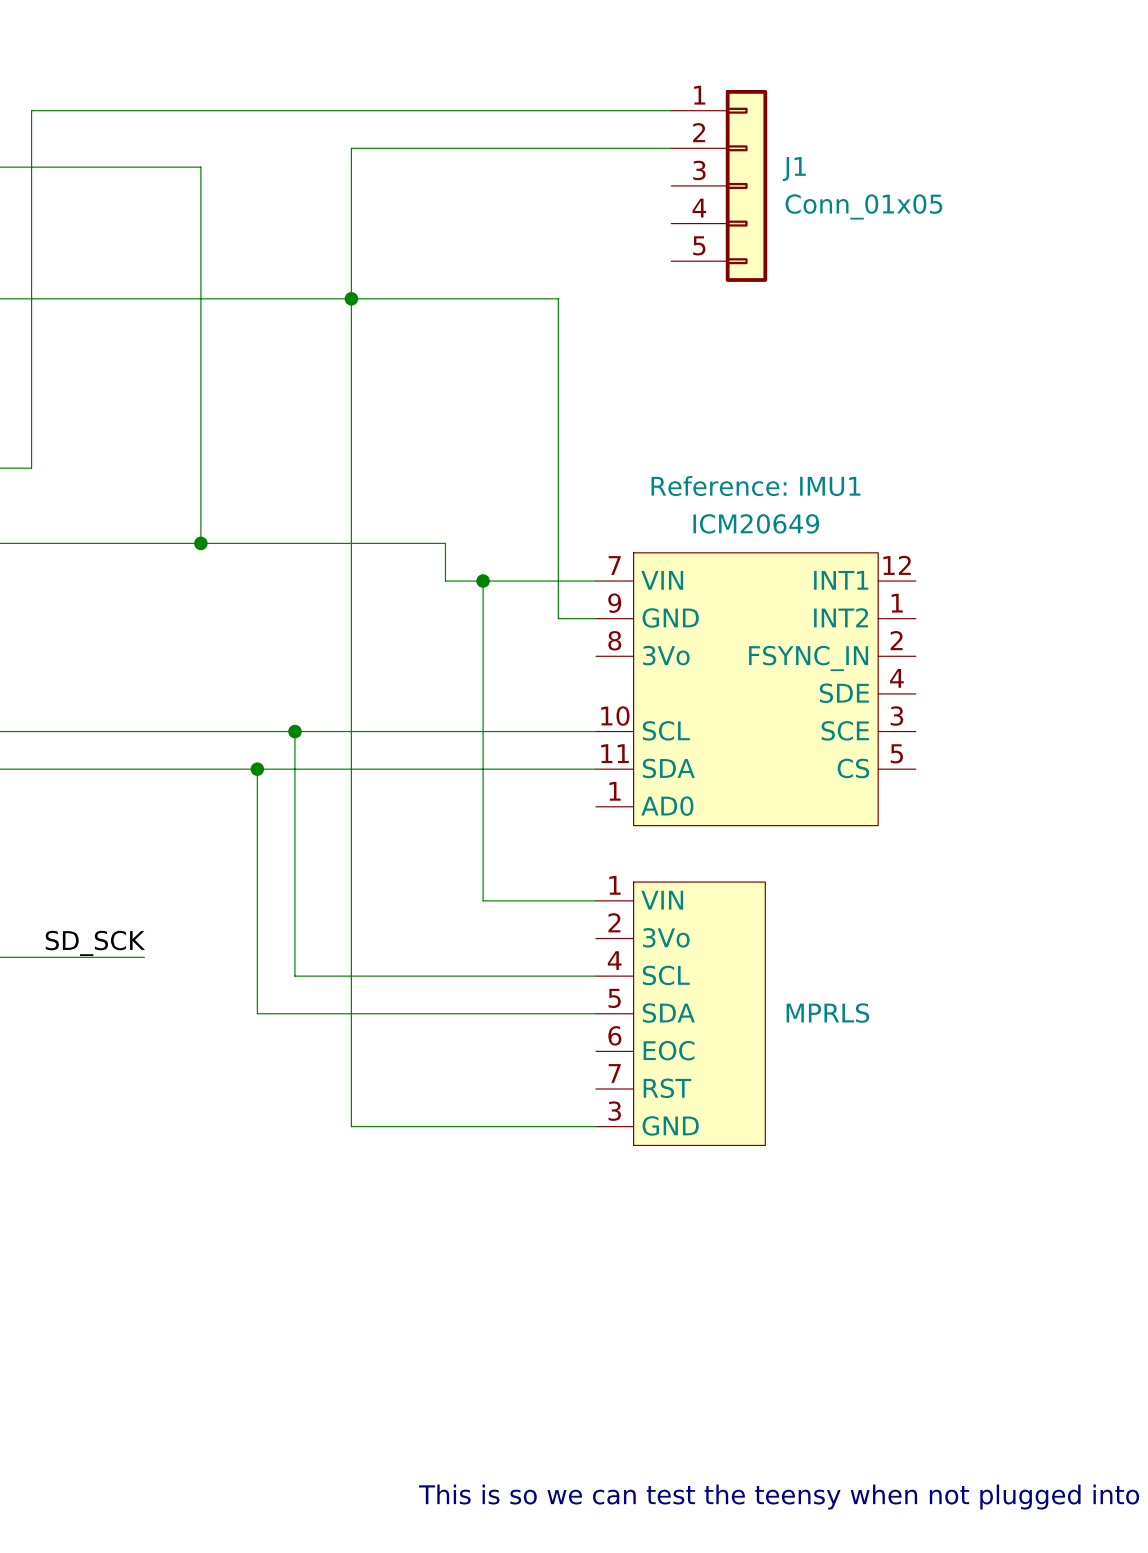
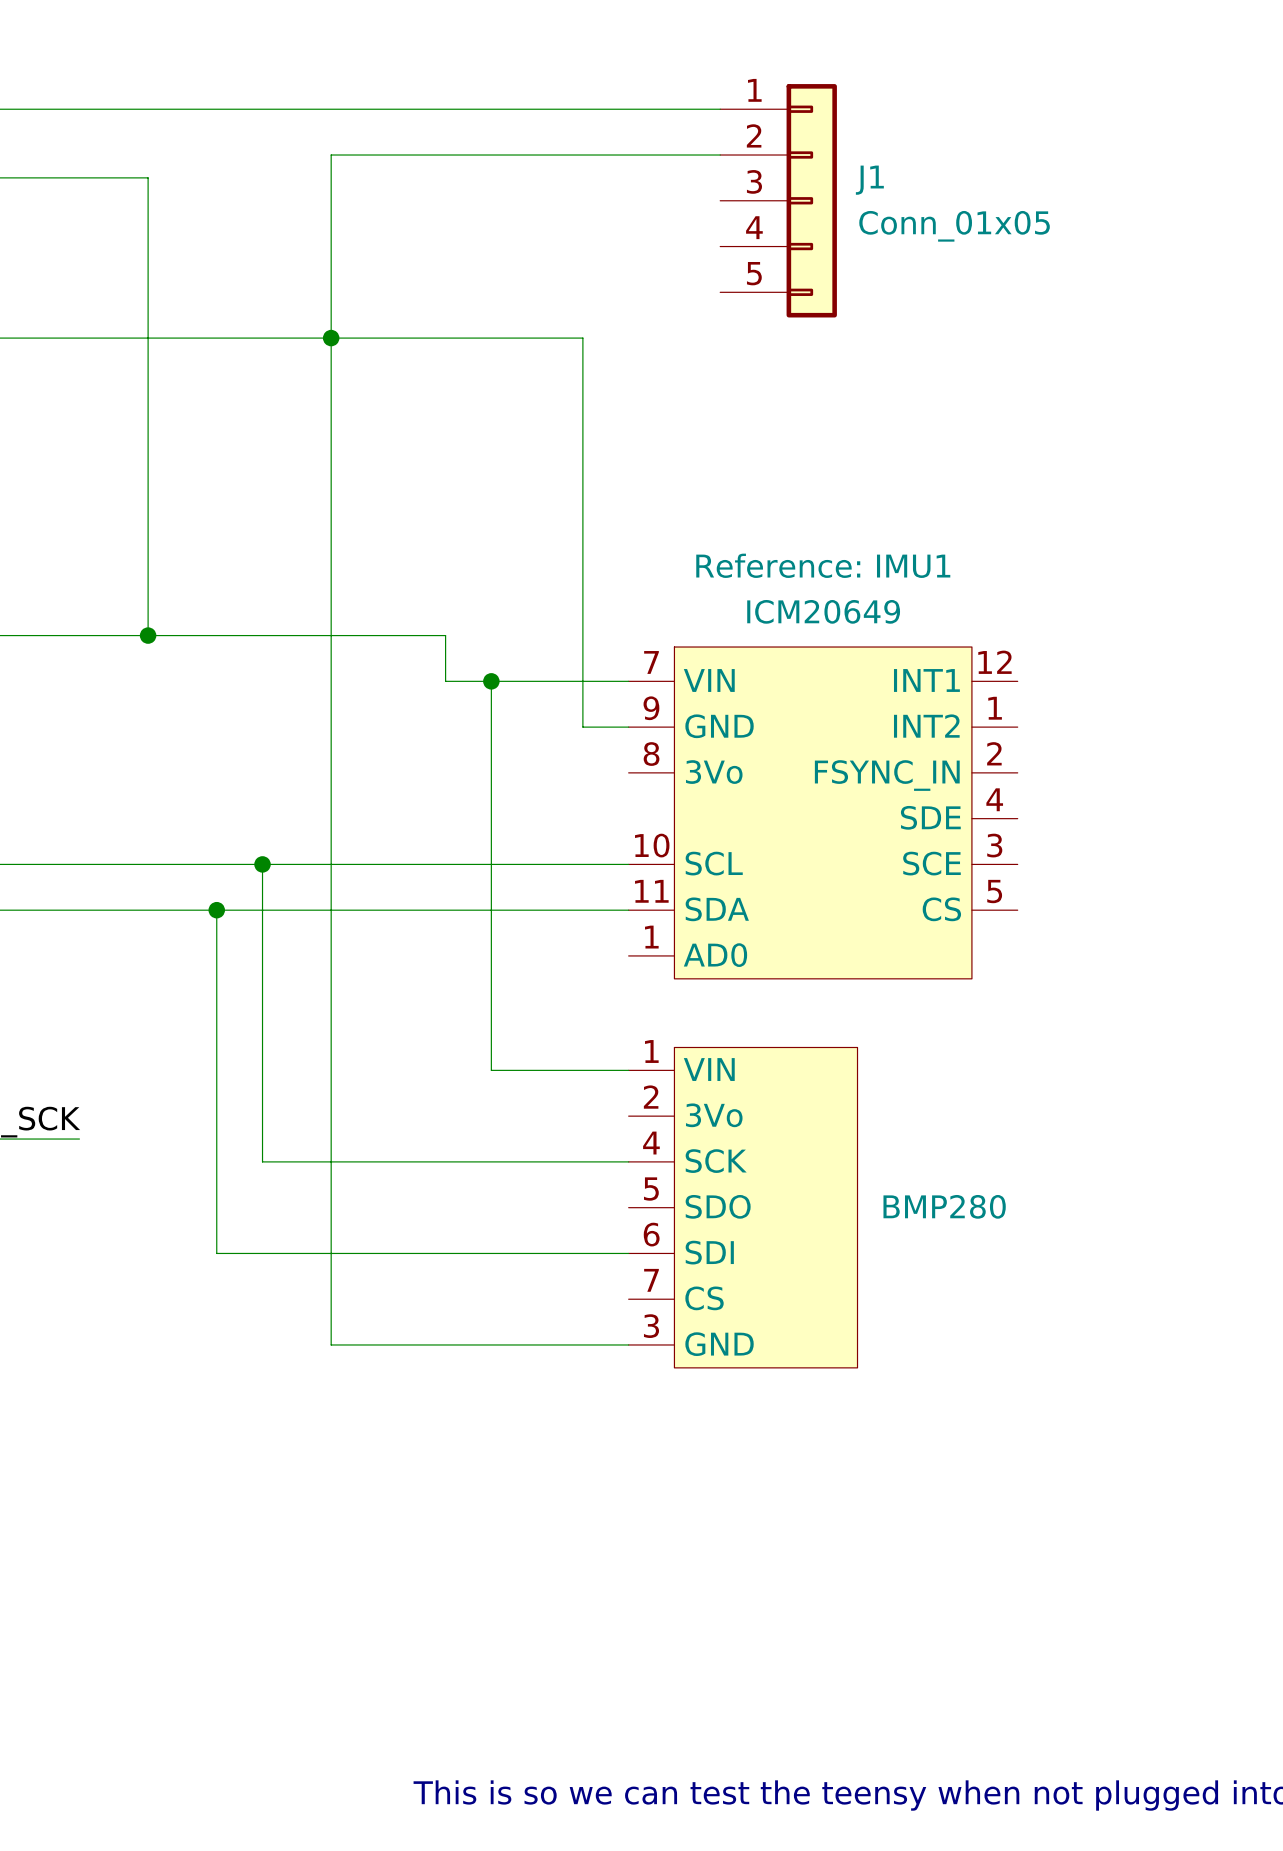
part symbol: [595, 882, 766, 1146] -> [628, 1047, 858, 1368]
wire: (257, 1013) (595, 1013) -> (216, 1207) (216, 1253) (628, 1253)
part value: MPRLS (827, 1013) -> BMP280 (944, 1206)

